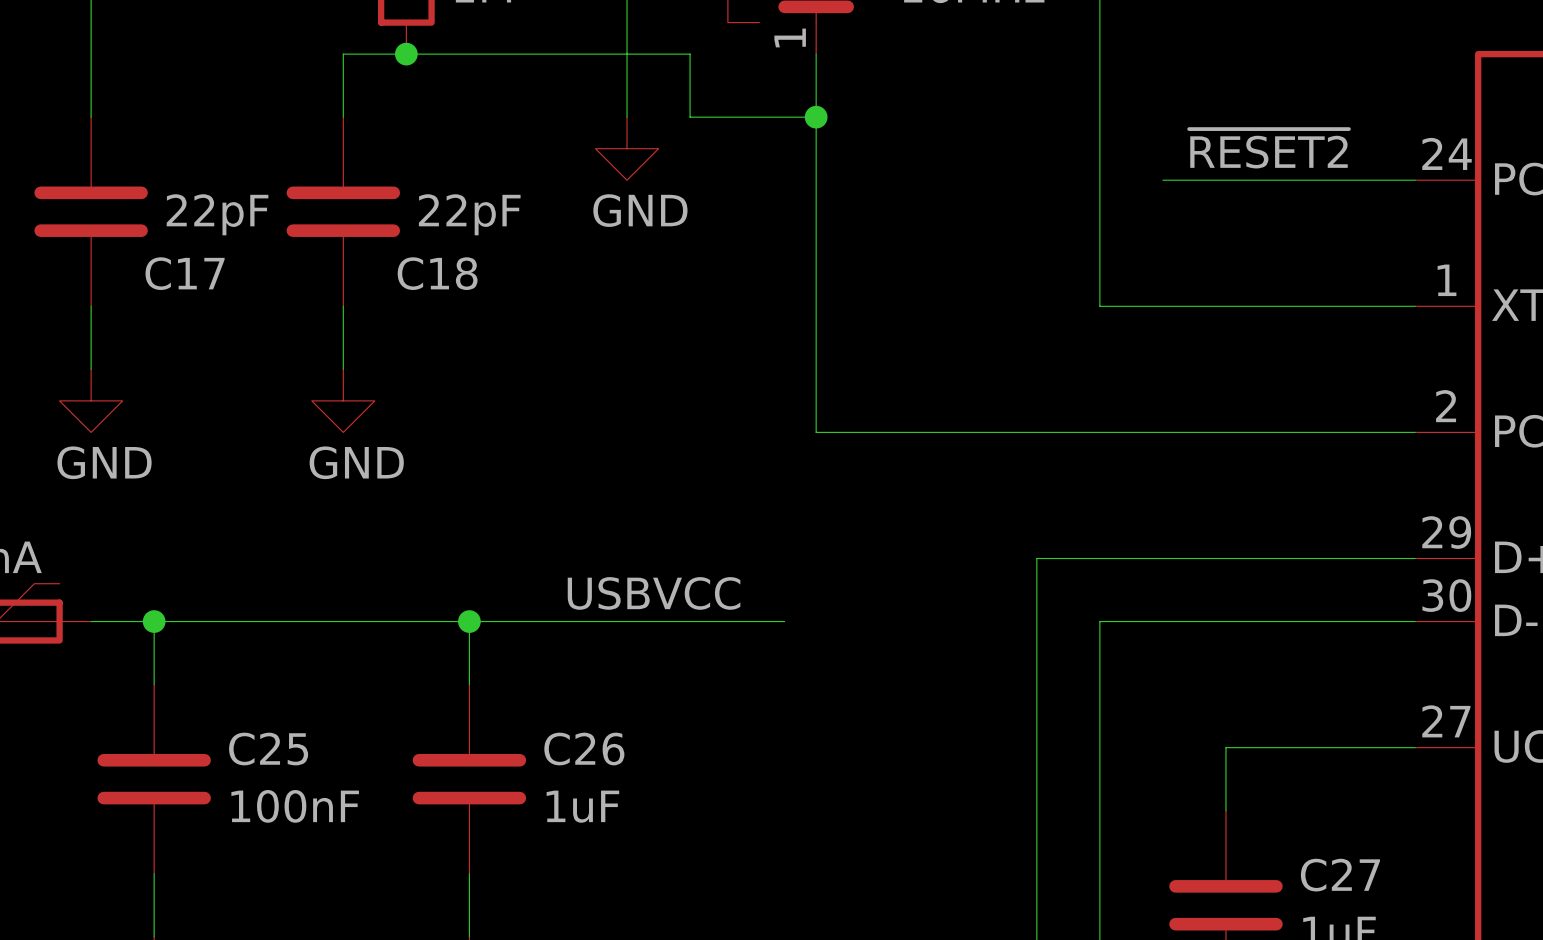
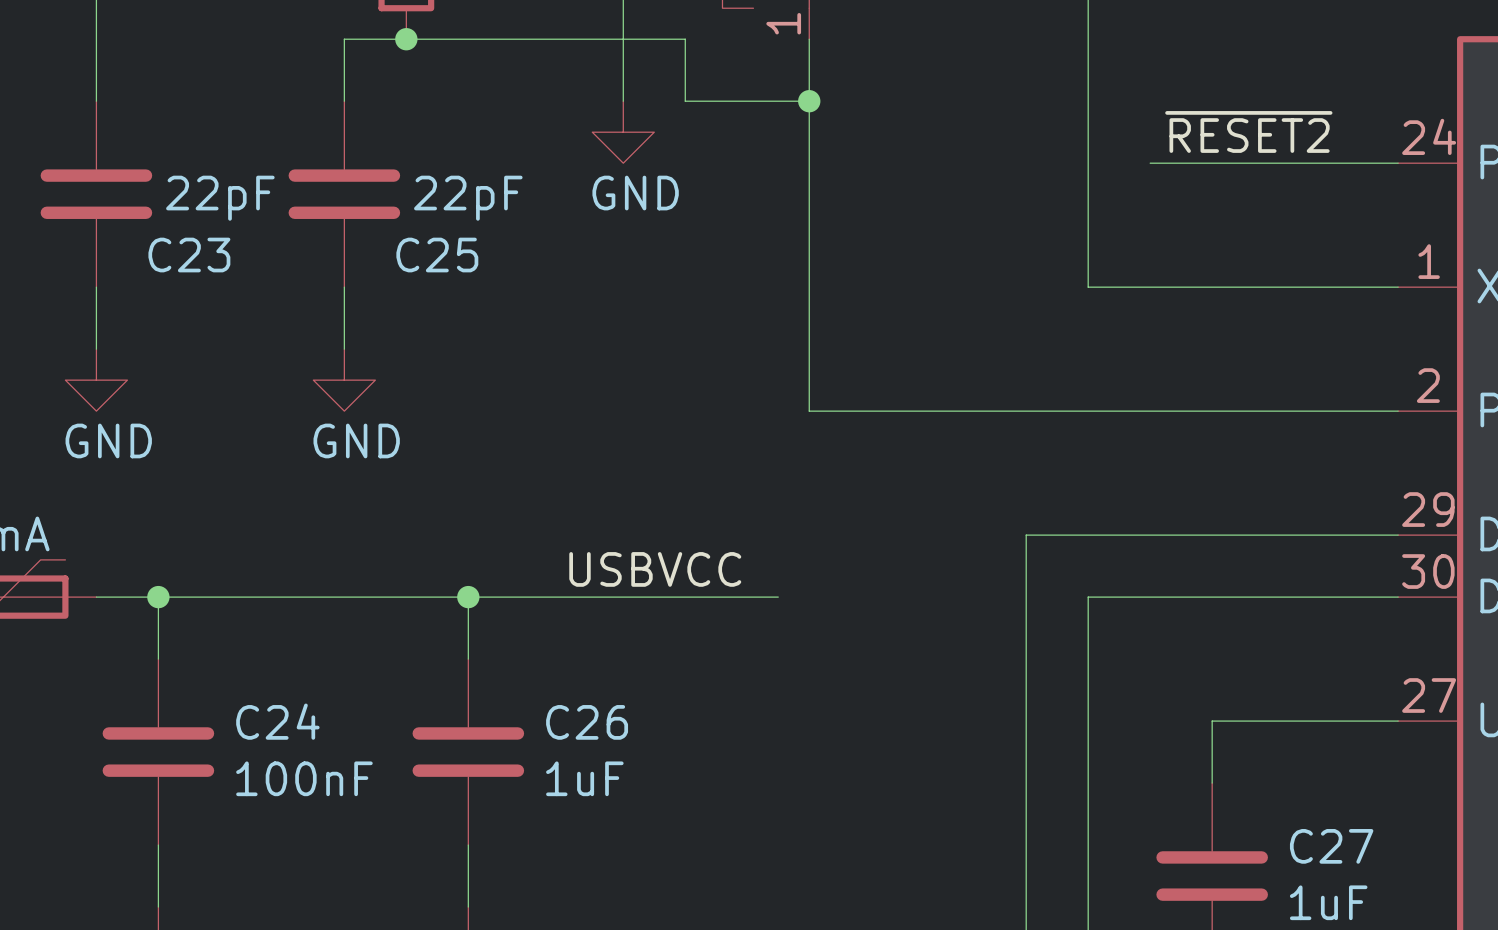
C17 name: C17 (185, 273) -> C23 (189, 255)
C18 name: C18 (437, 273) -> C25 (437, 255)
C25 name: C25 (268, 749) -> C24 (277, 721)

